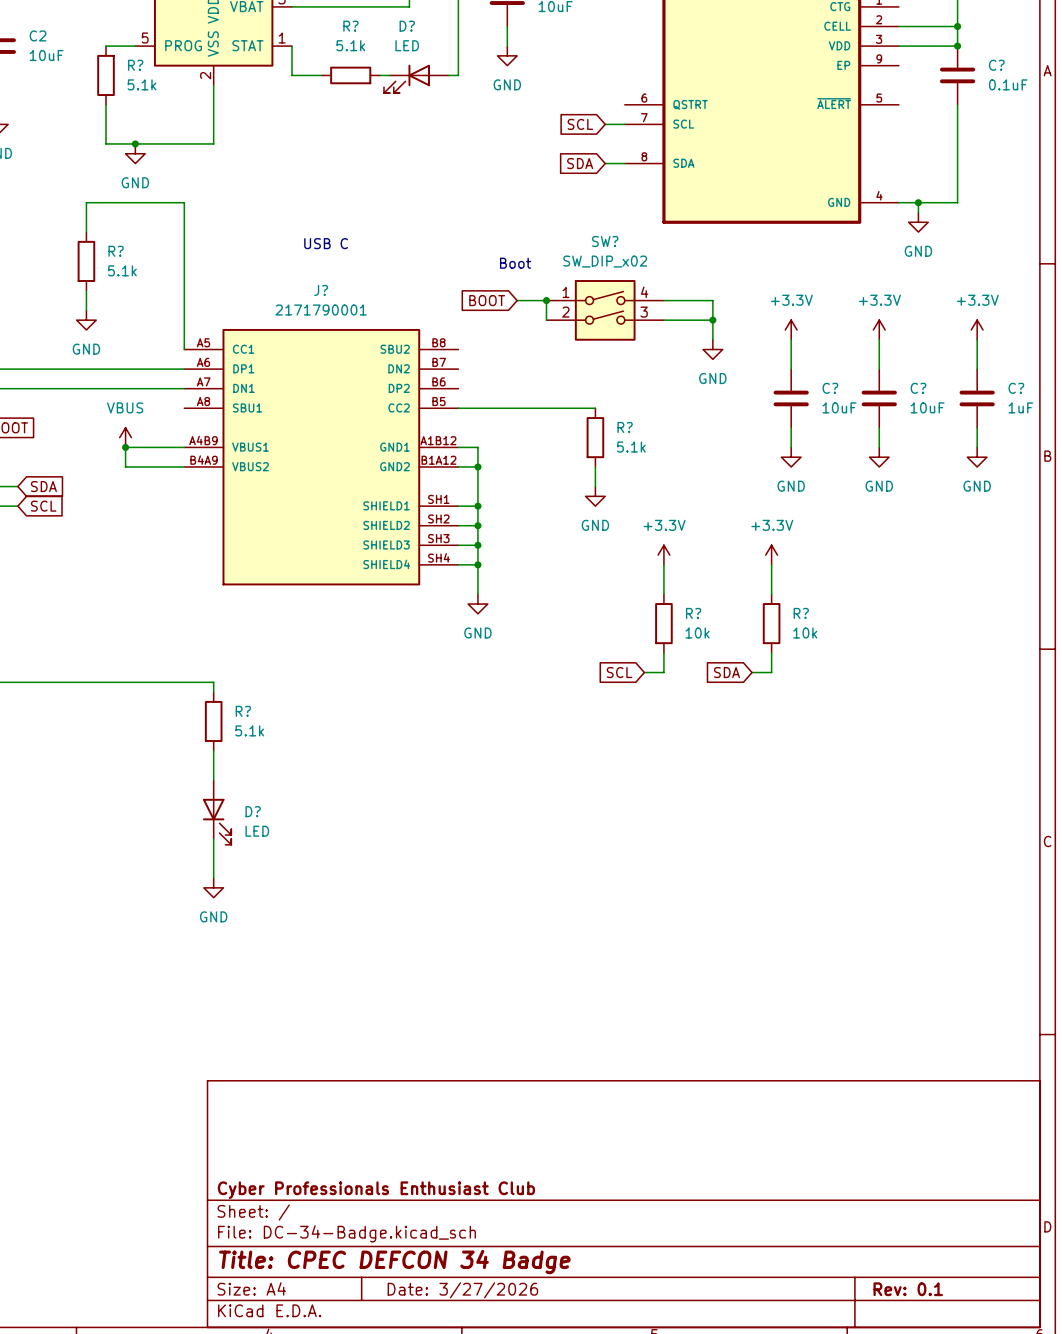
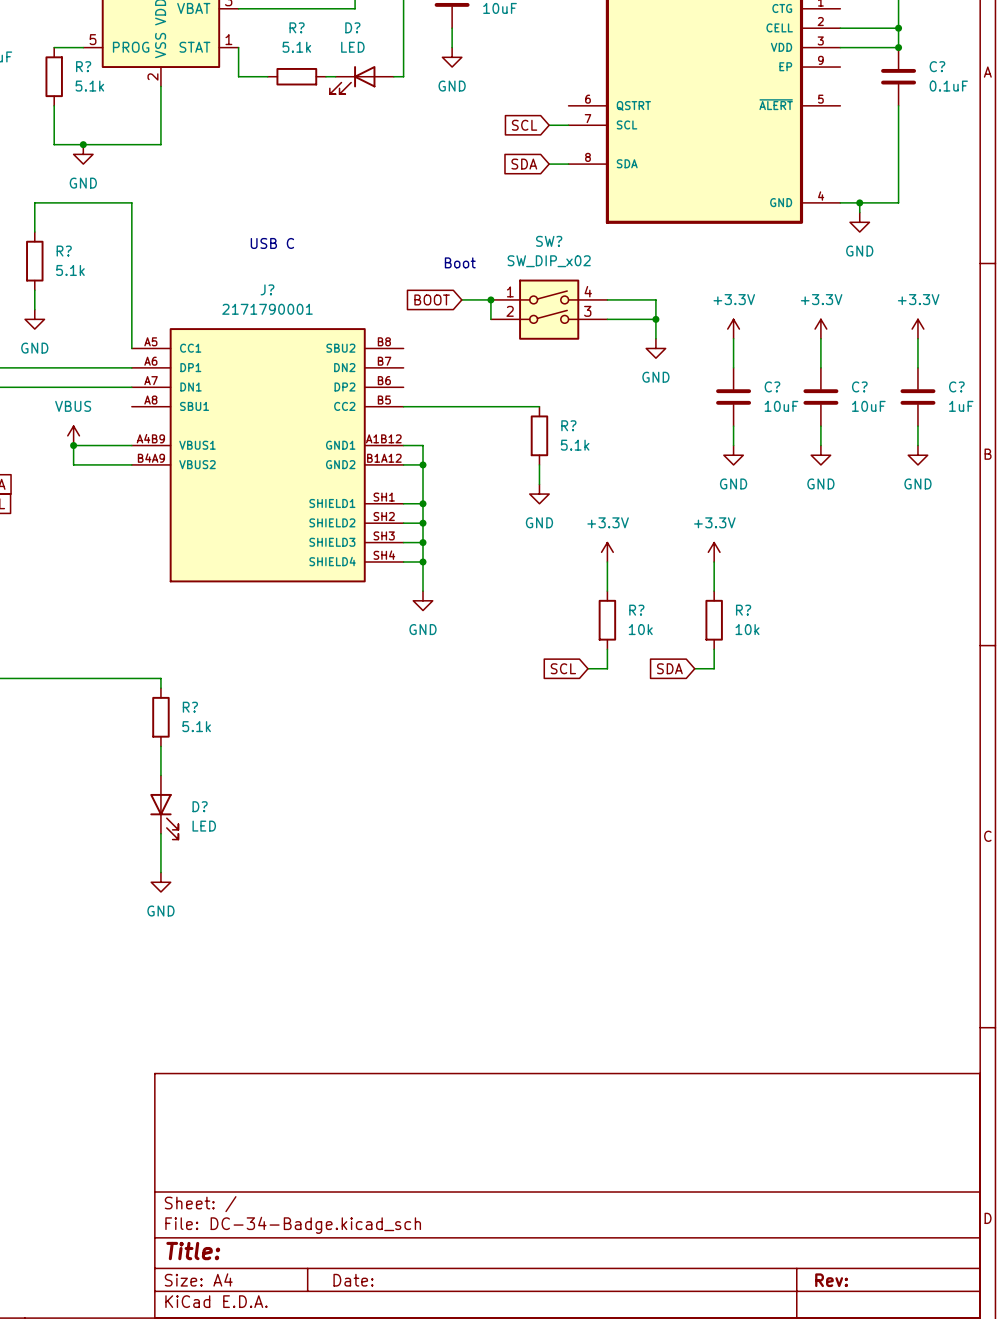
title block: Cyber Professionals Enthusiast Club (376, 1190) -> none
title block: Title: CPEC DEFCON 34 Badge (394, 1262) -> Title: (193, 1251)
title block: Rev: 0.1 (908, 1289) -> Rev: (831, 1280)
title block: Date: 3/27/2026 (462, 1290) -> Date: (353, 1280)

